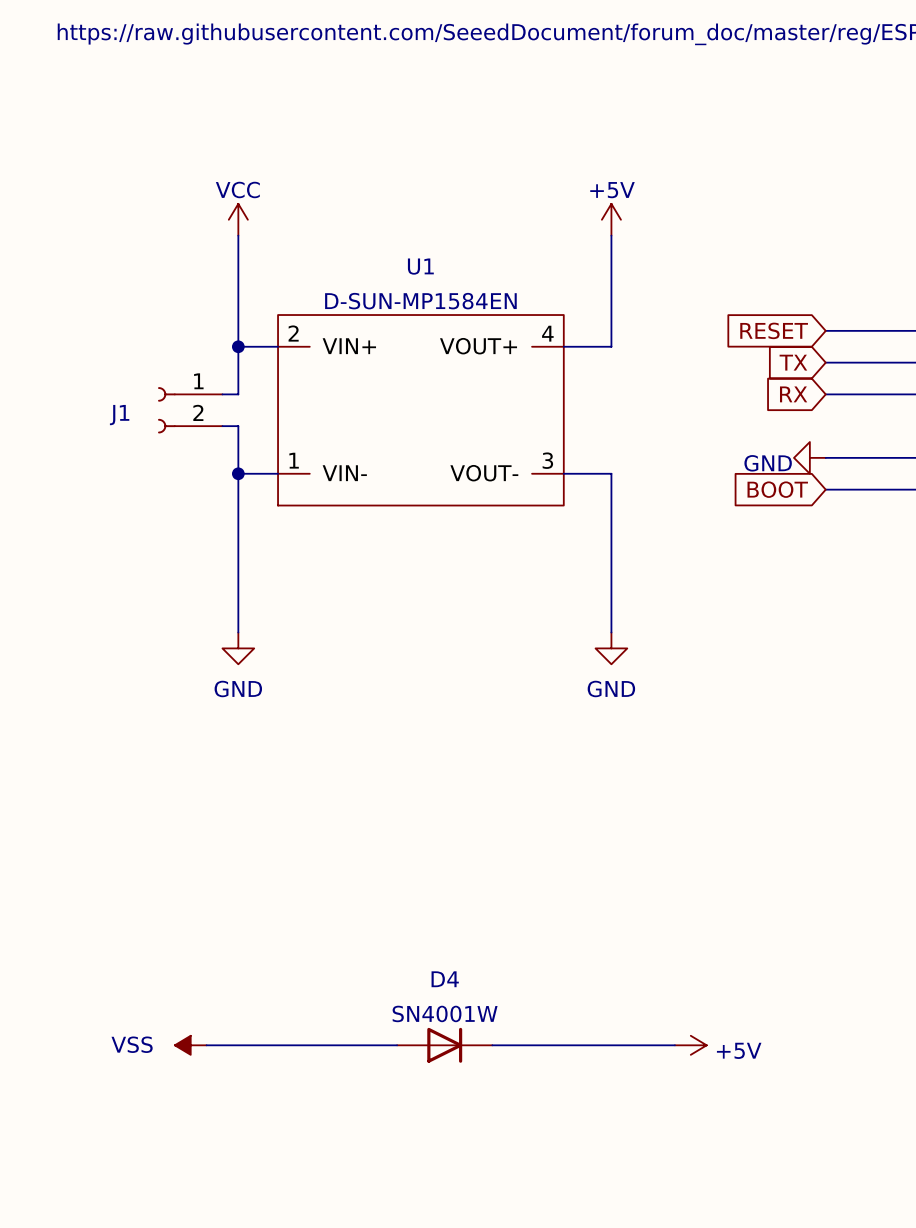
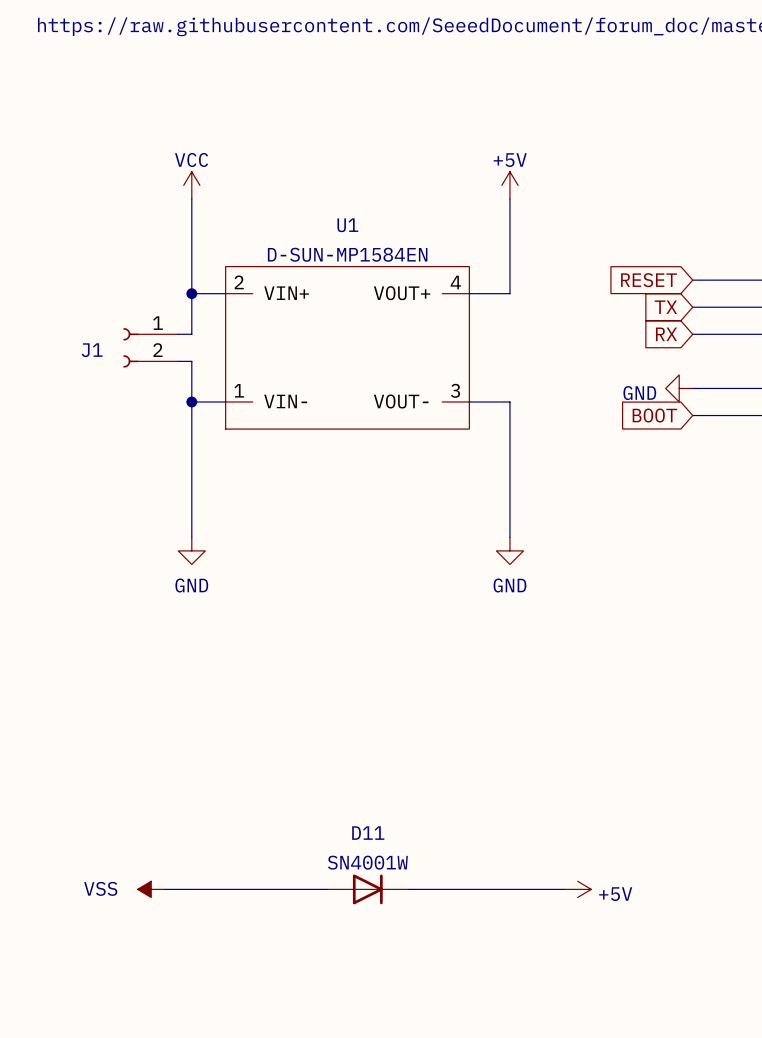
D4 name: D4 (445, 979) -> D11 (368, 833)

